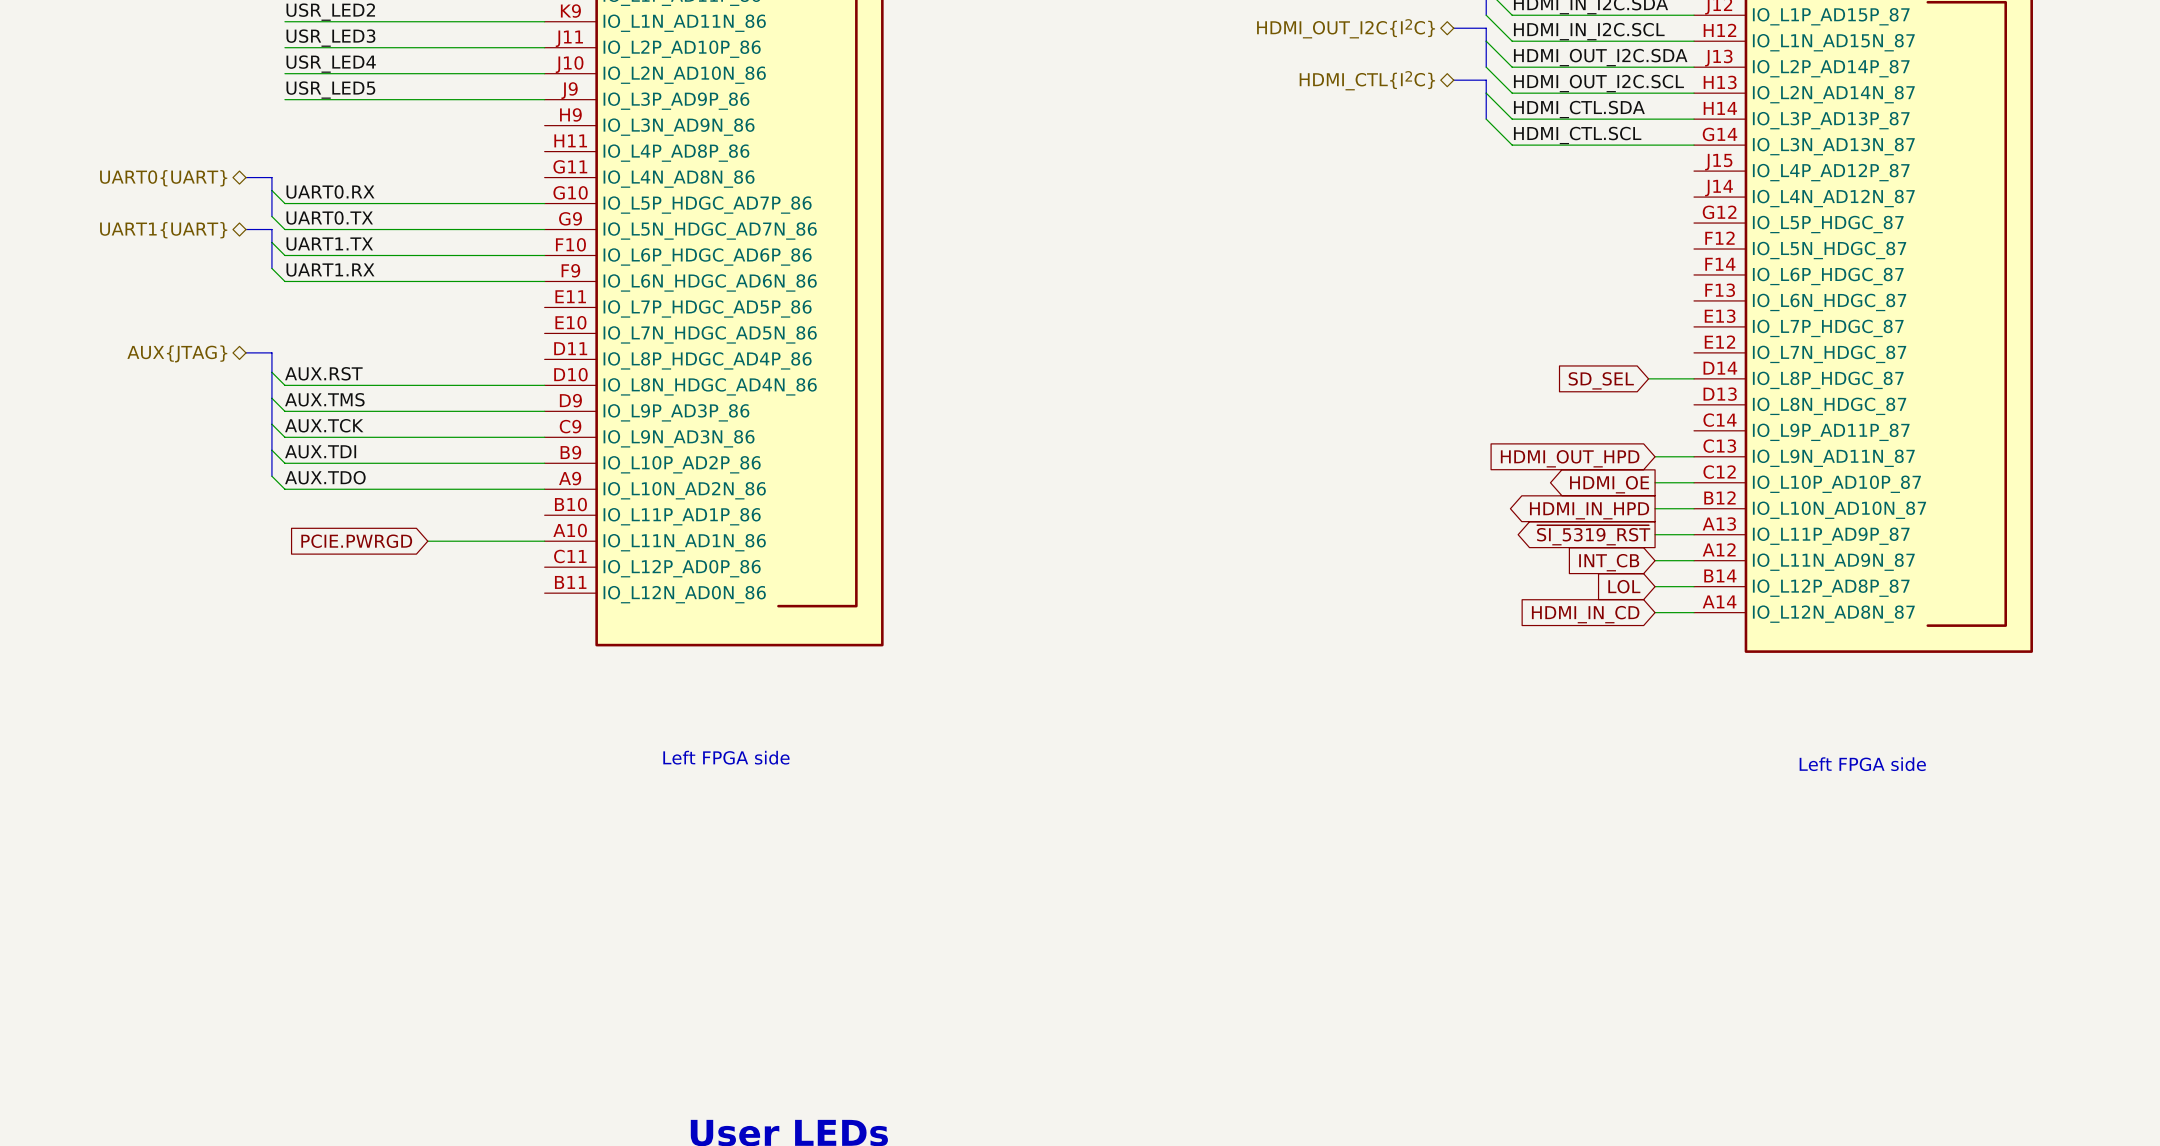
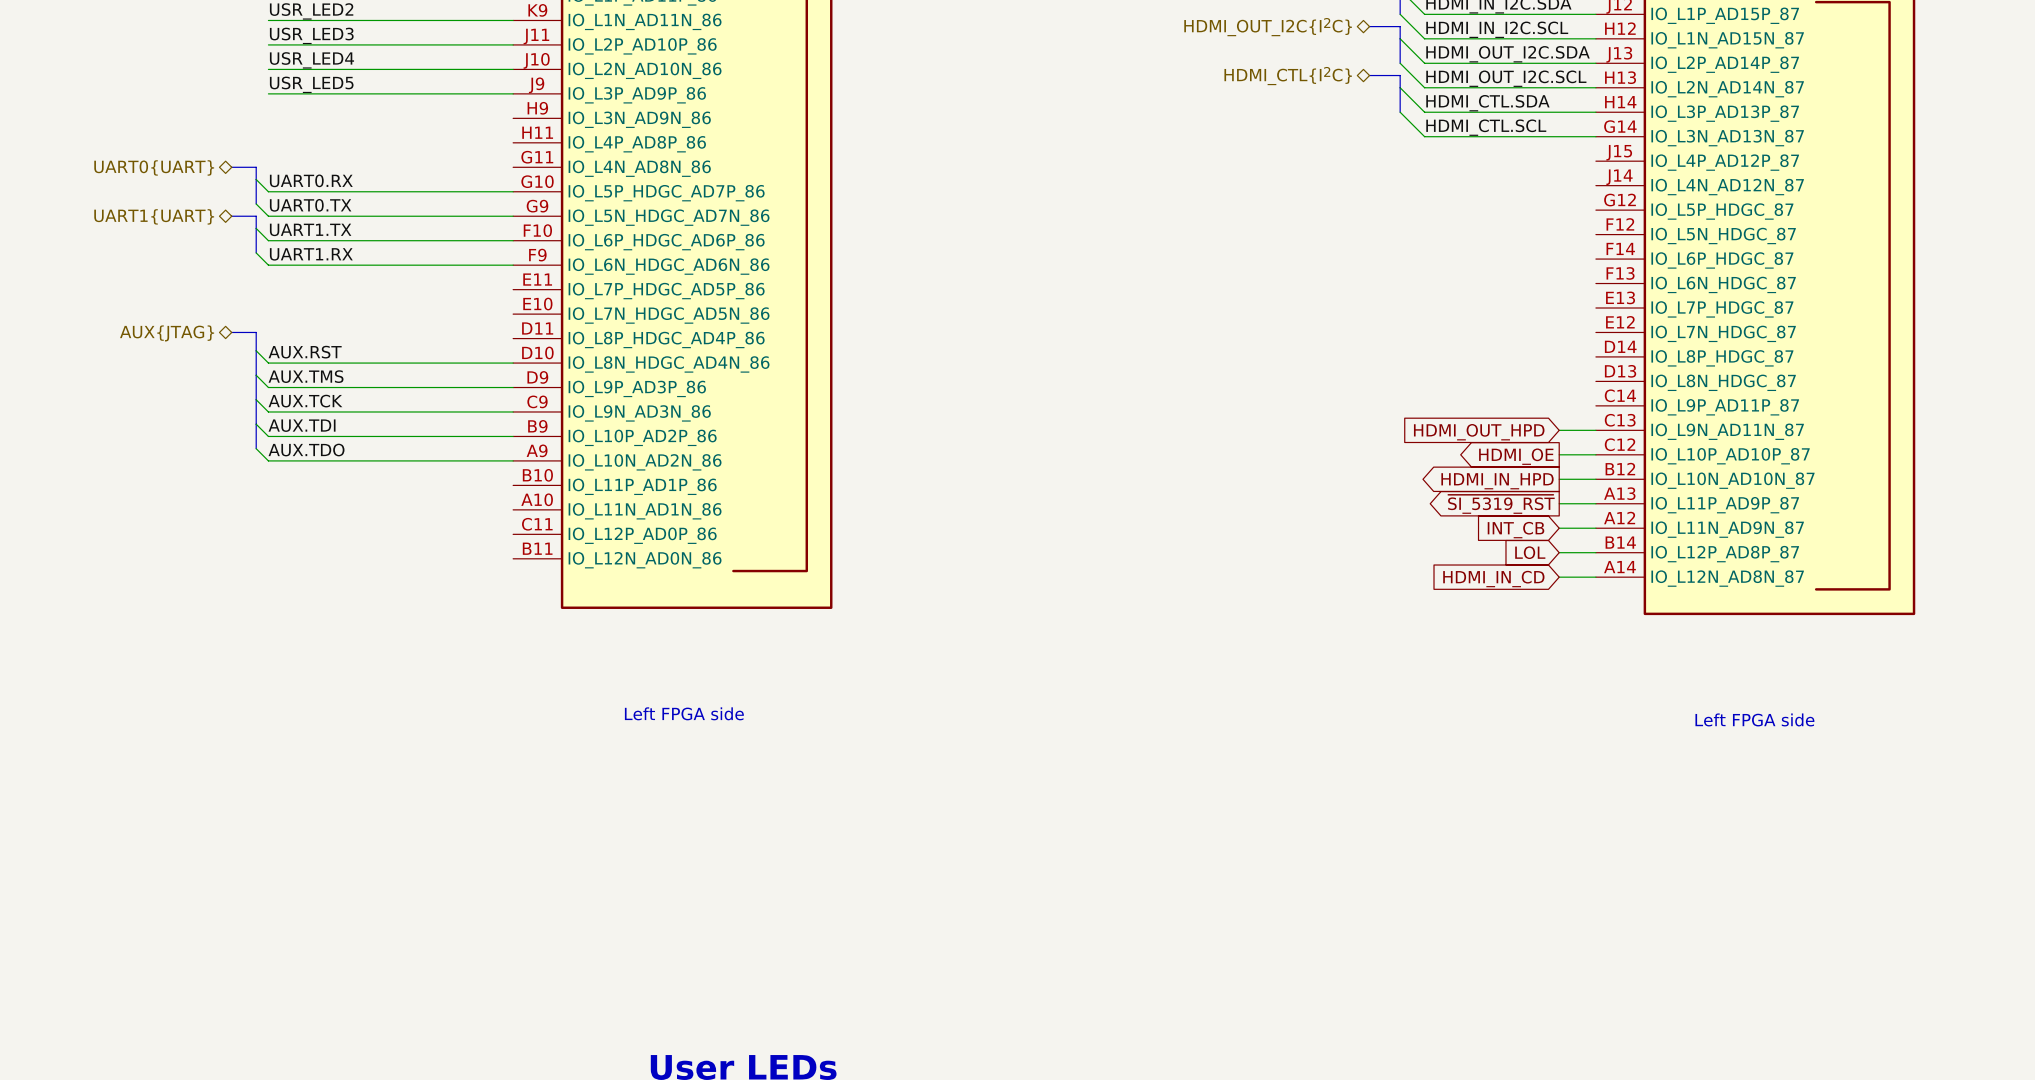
wire: (1648, 378) (1694, 378) -> none
global label: SD_SEL (1601, 380) -> none
global label: PCIE.PWRGD (356, 541) -> none
wire: (427, 541) (544, 541) -> none

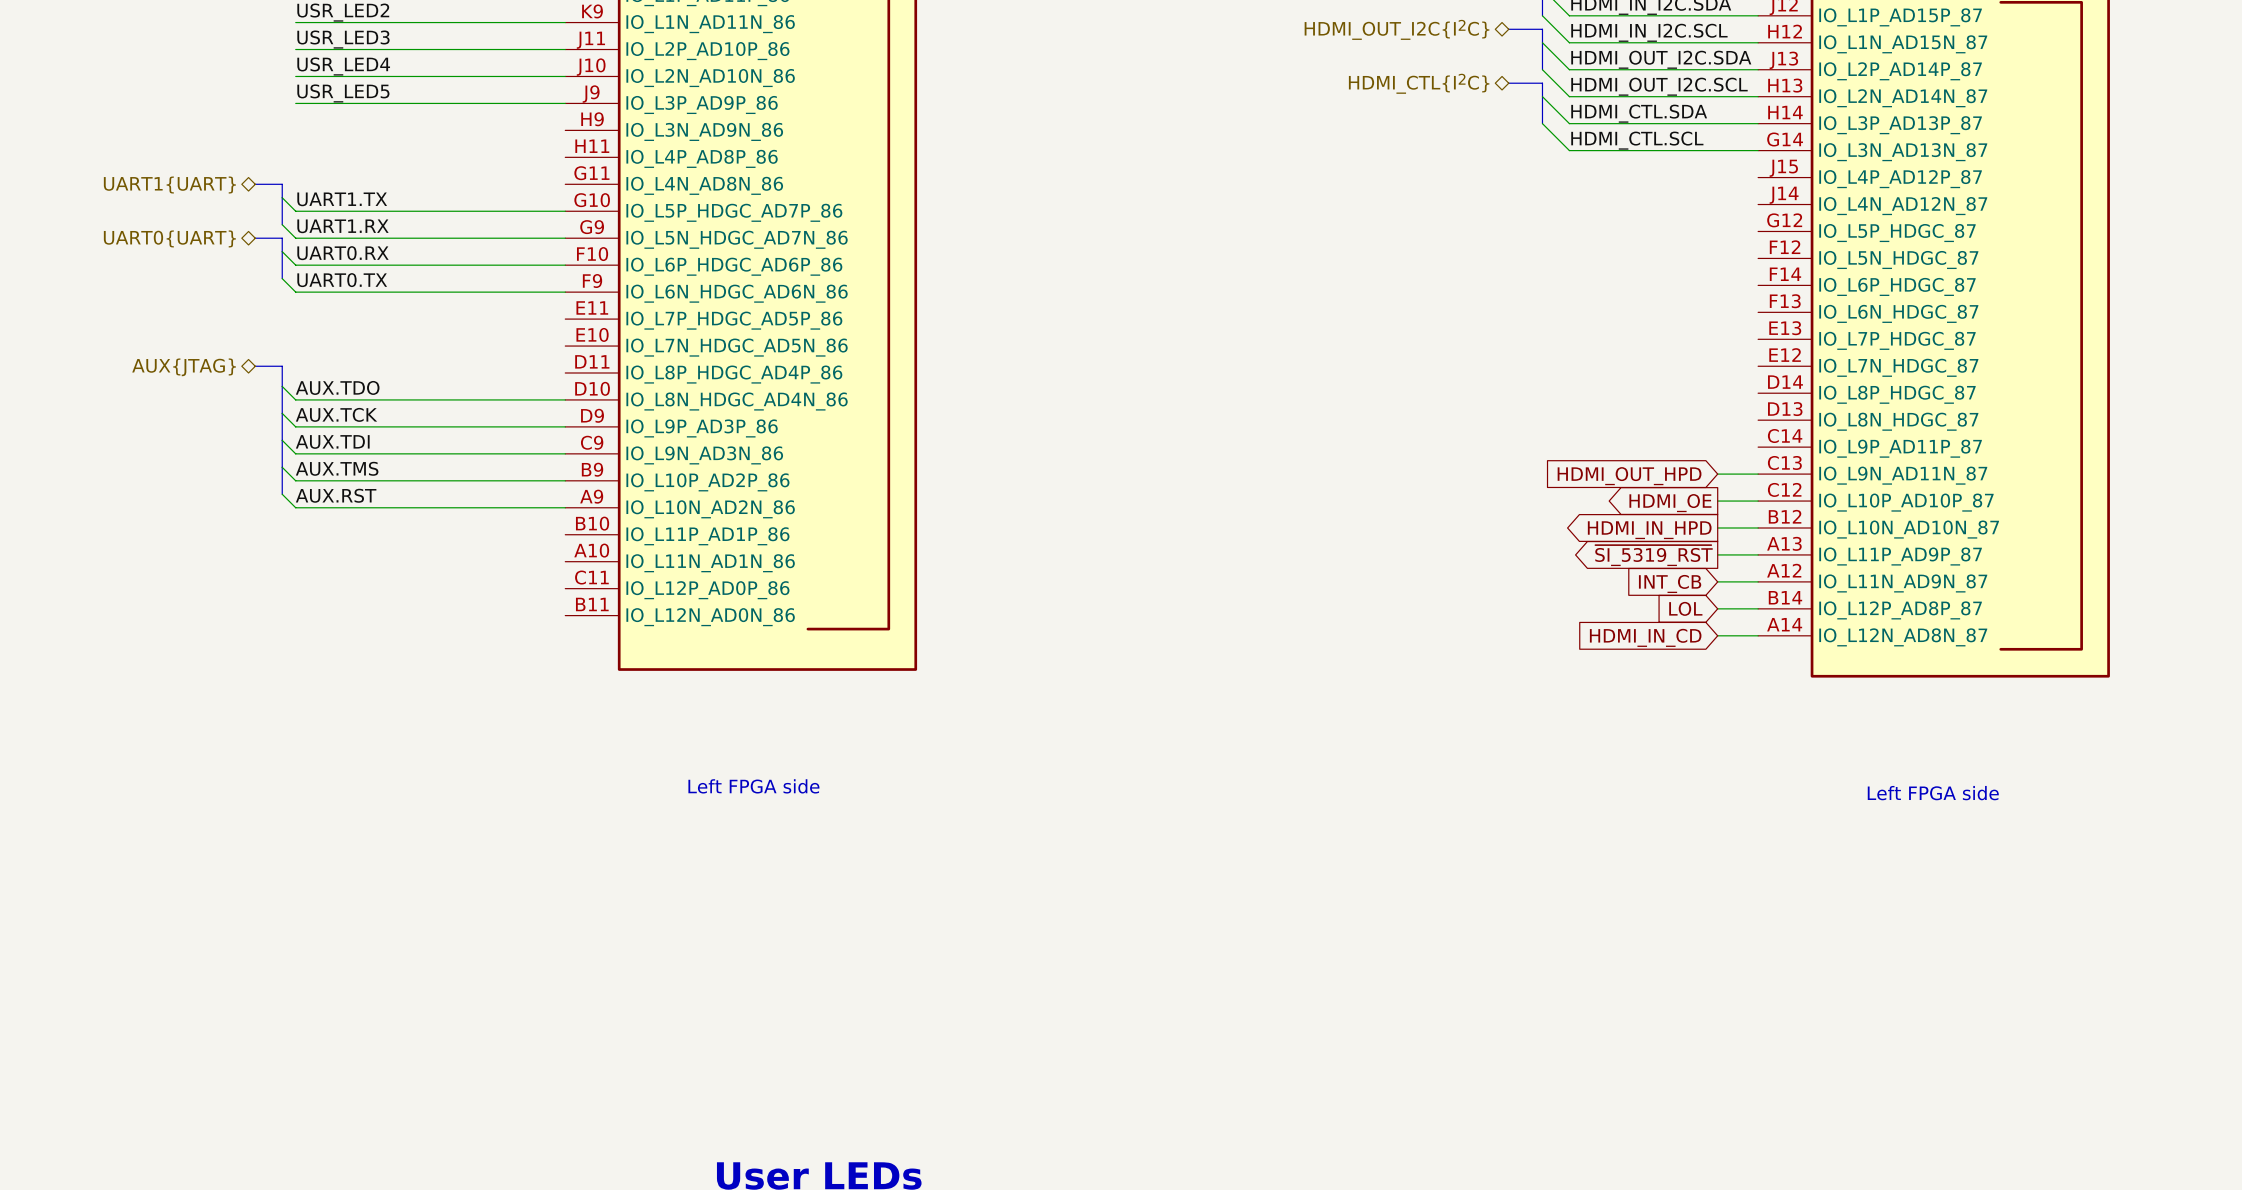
hierarchical label: UART0{UART} (154, 167) -> UART1{UART} (169, 185)
label: UART0.RX (311, 180) -> UART1.TX (342, 199)
label: UART0.TX (310, 205) -> UART1.RX (342, 226)
hierarchical label: UART1{UART} (154, 216) -> UART0{UART} (169, 238)
label: UART1.TX (310, 229) -> UART0.RX (342, 253)
label: UART1.RX (311, 254) -> UART0.TX (342, 280)
label: AUX.RST (305, 352) -> AUX.TDO (337, 387)
label: AUX.TMS (306, 376) -> AUX.TCK (336, 414)
label: AUX.TCK (305, 401) -> AUX.TDI (332, 441)
label: AUX.TDI (302, 425) -> AUX.TMS (337, 468)
label: AUX.TDO (306, 450) -> AUX.RST (336, 495)

